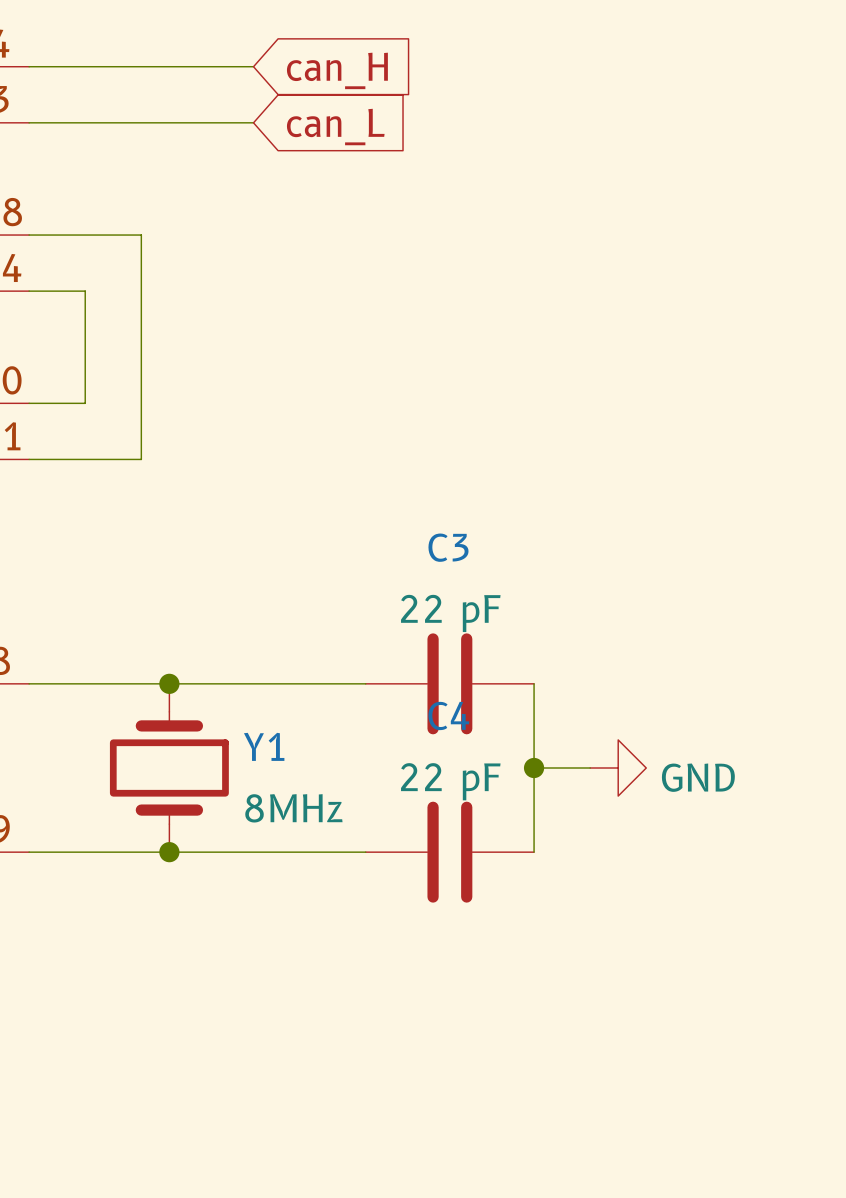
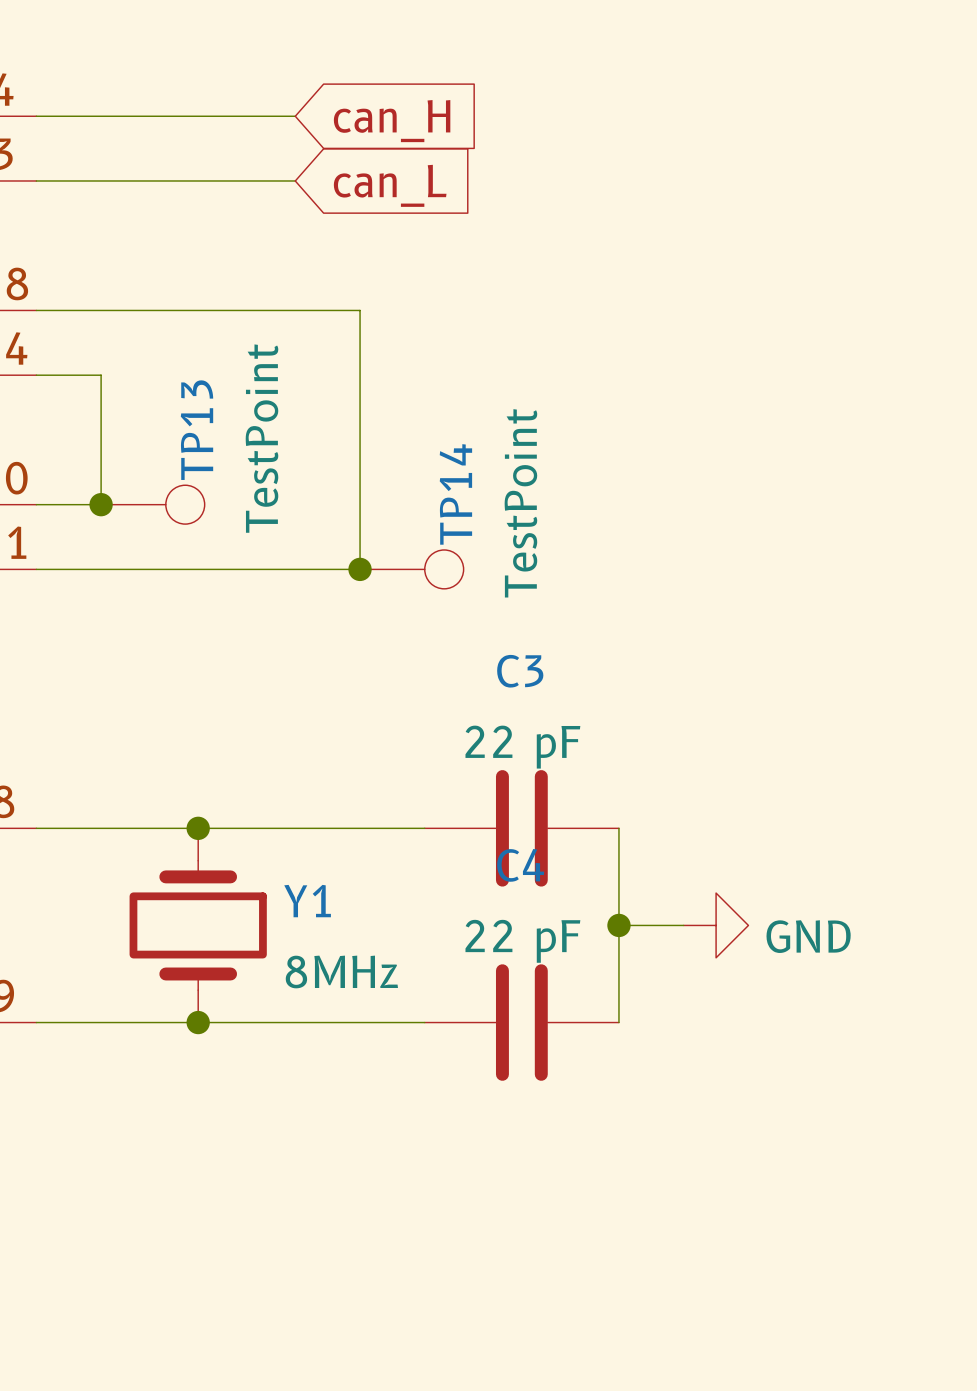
wire: (141, 235) (141, 459) -> (165, 310) (360, 310) (360, 569) (165, 569)
junction: none -> (101, 504)
TP13: none -> TestPoint (152, 504)
junction: none -> (360, 569)
TP14: none -> TestPoint (411, 569)

